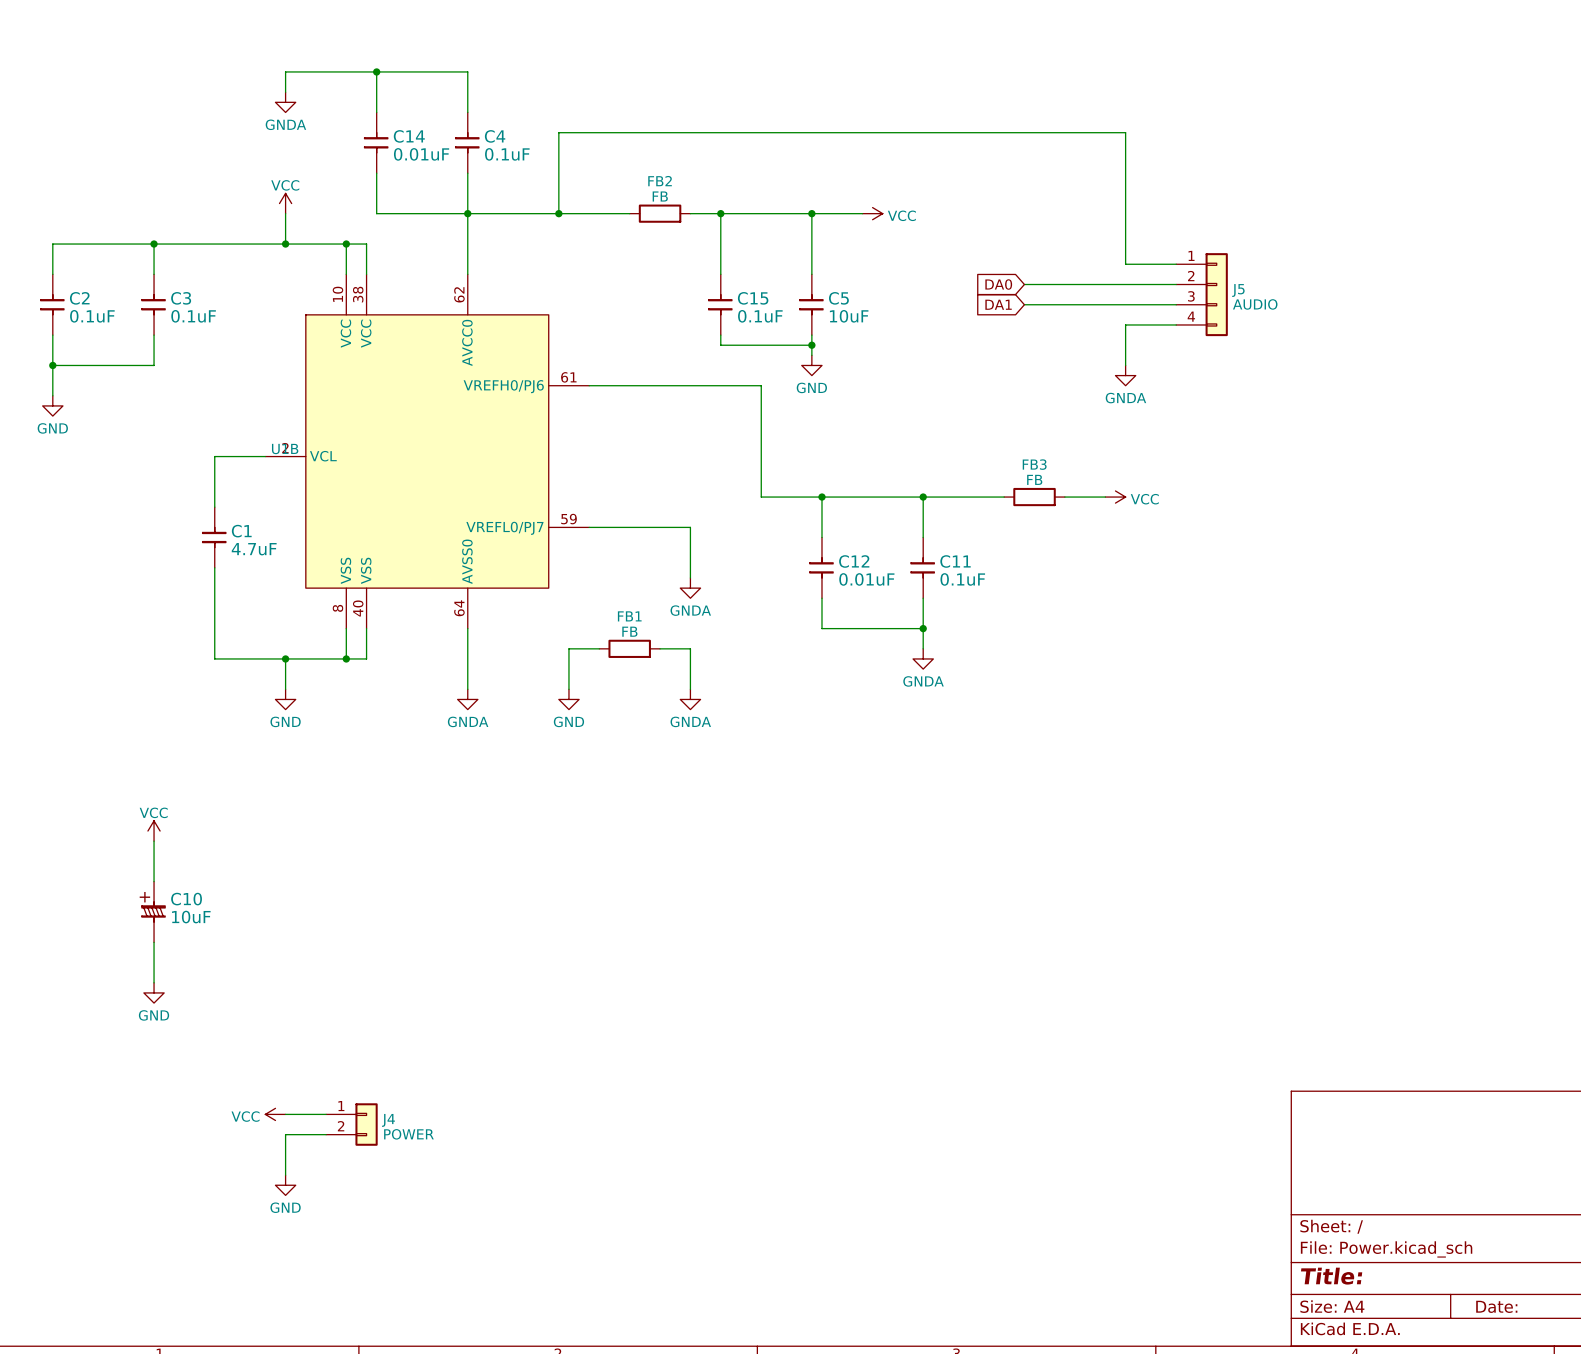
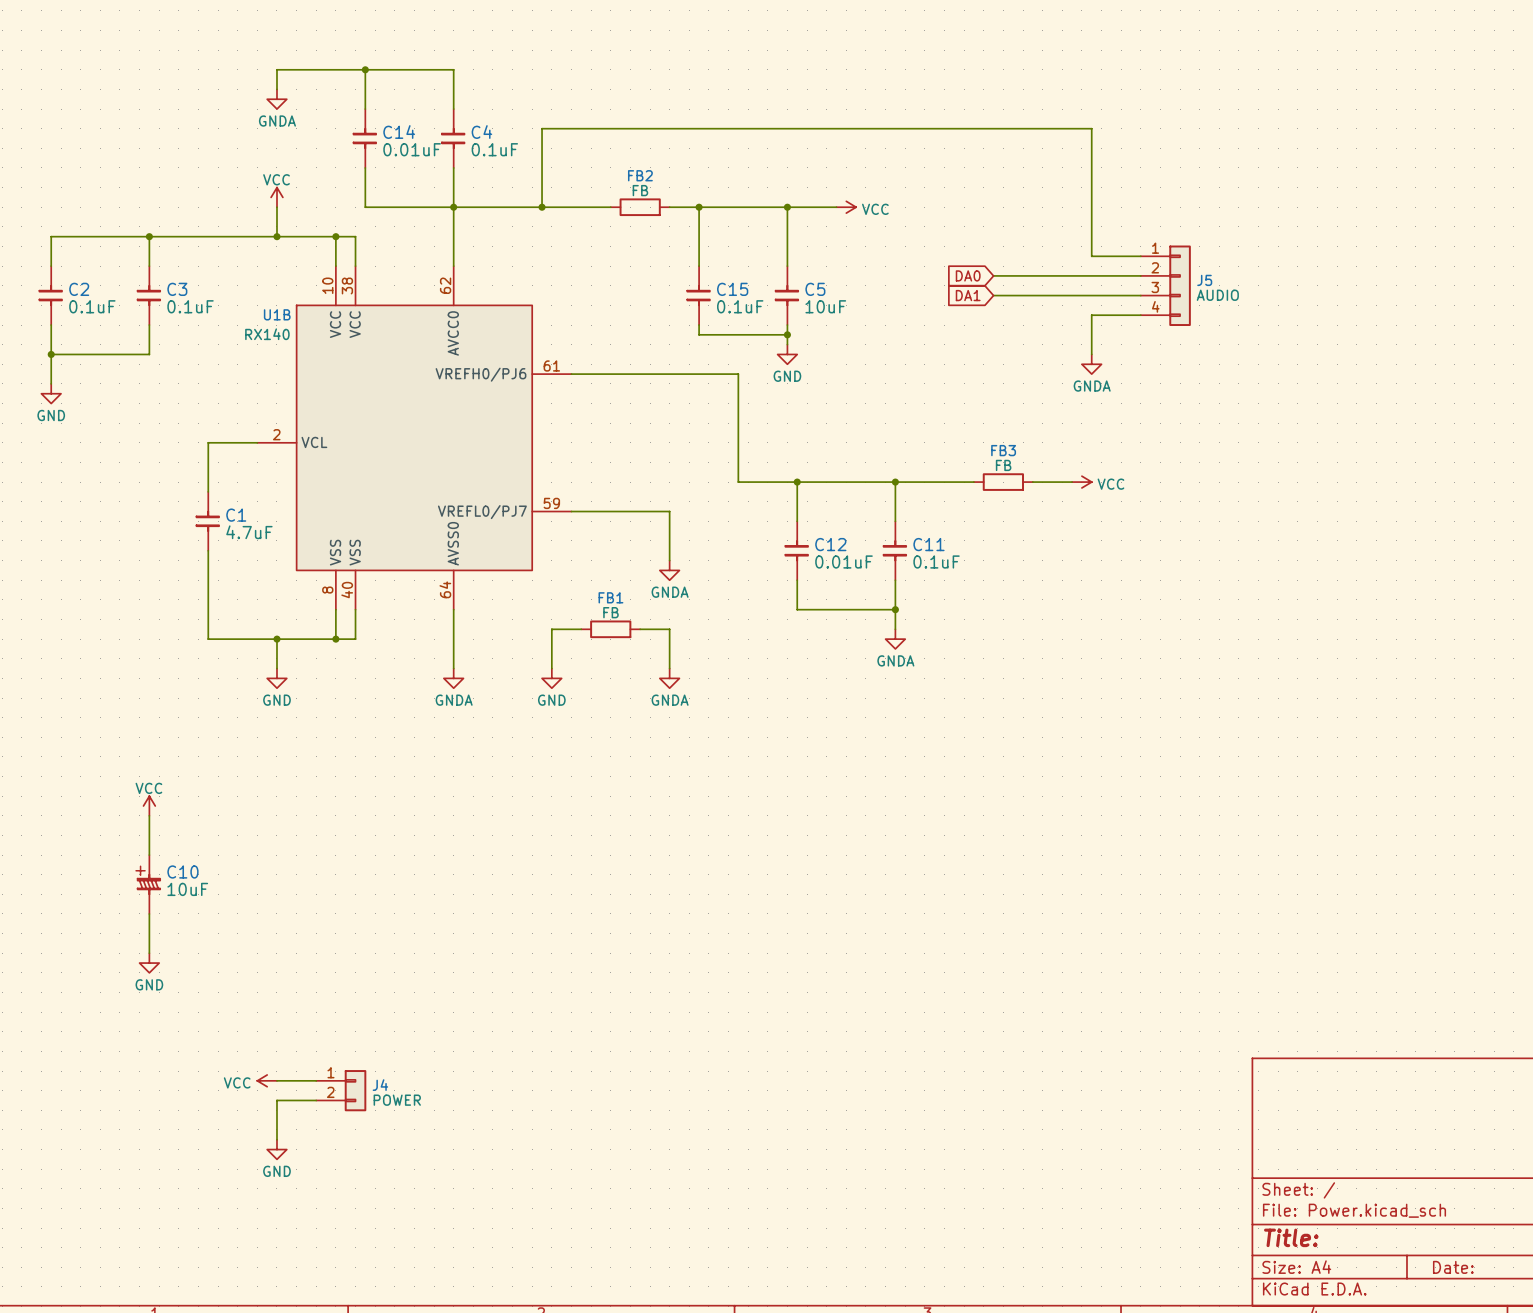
U1B value: none -> RX140 (267, 334)
U1B name position: U1B (285, 449) -> U1B (277, 314)

